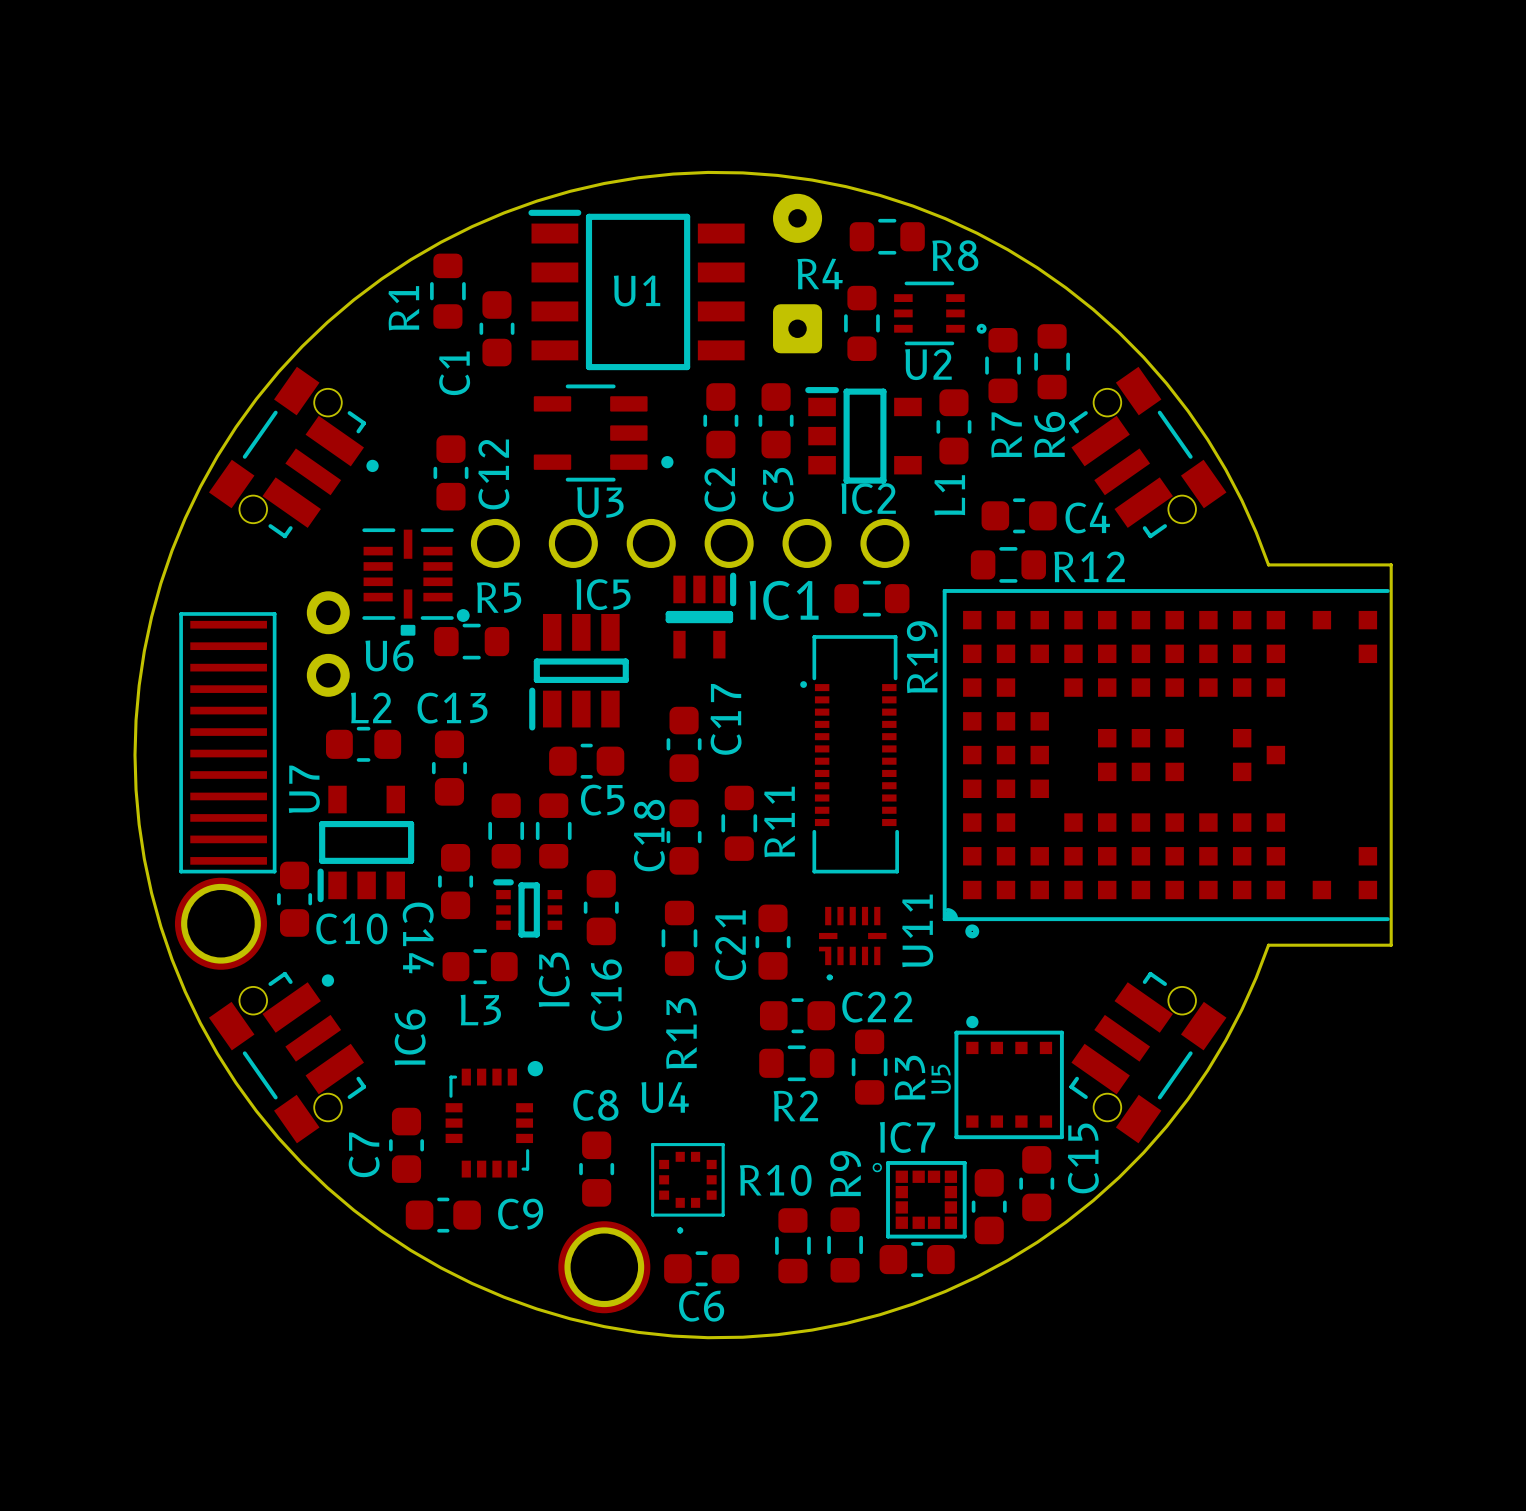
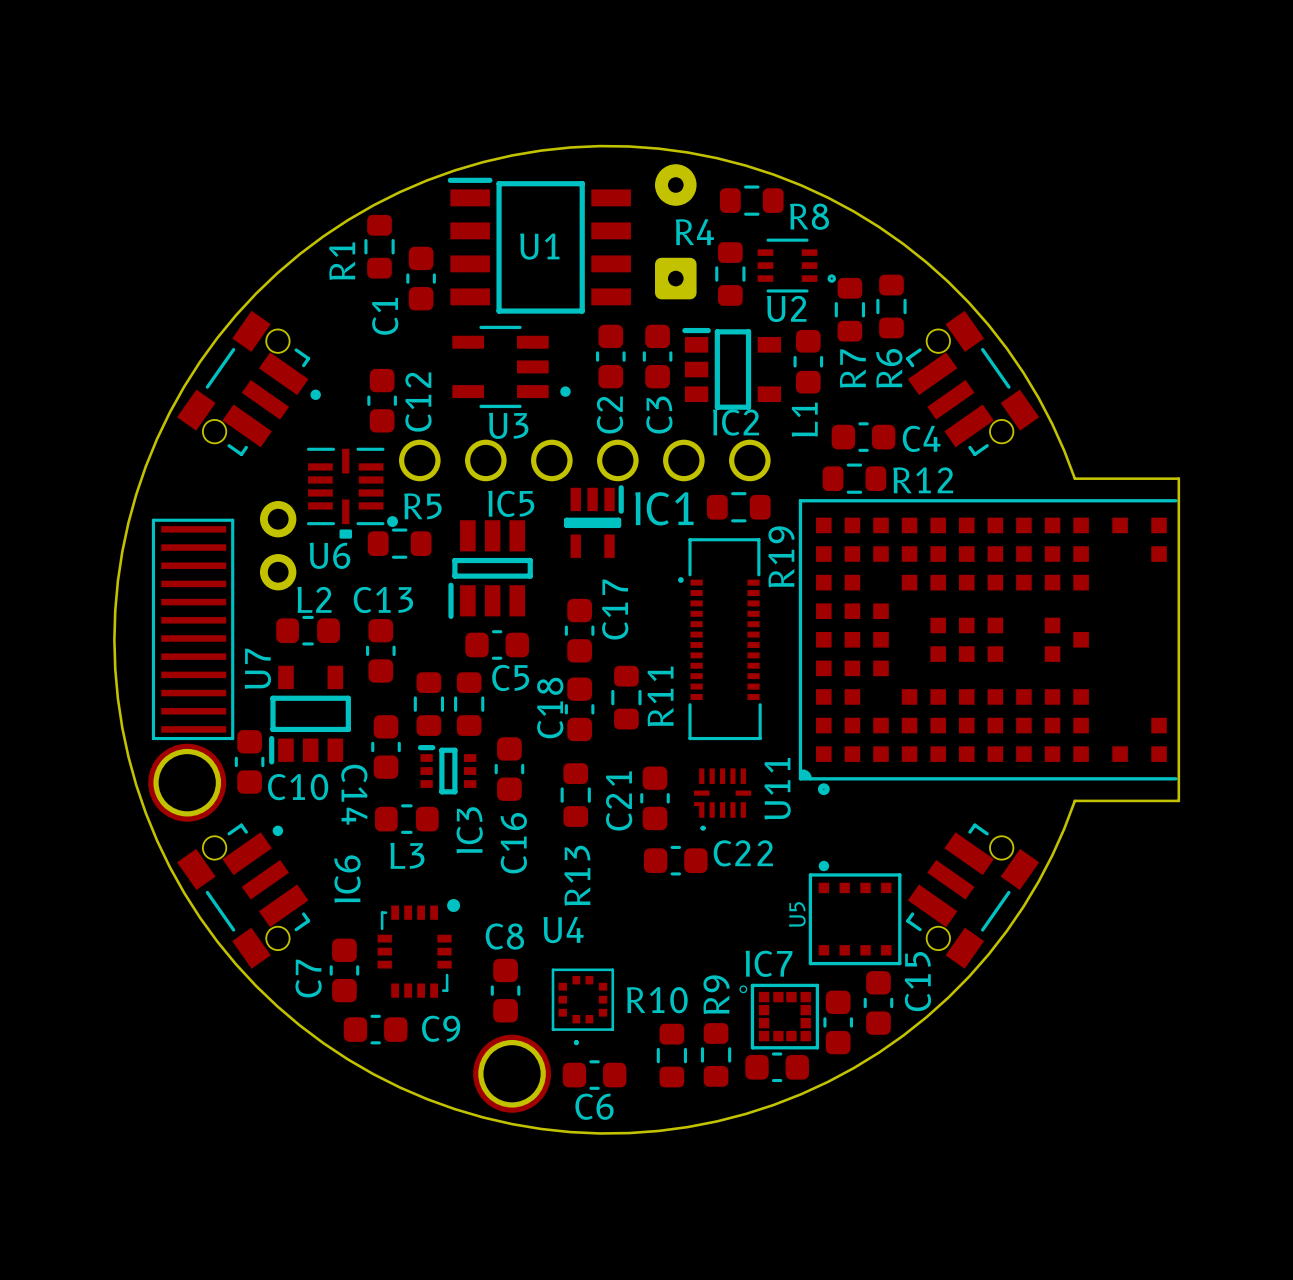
R2: (796, 1063) -> none
R3: (869, 1067) -> none

